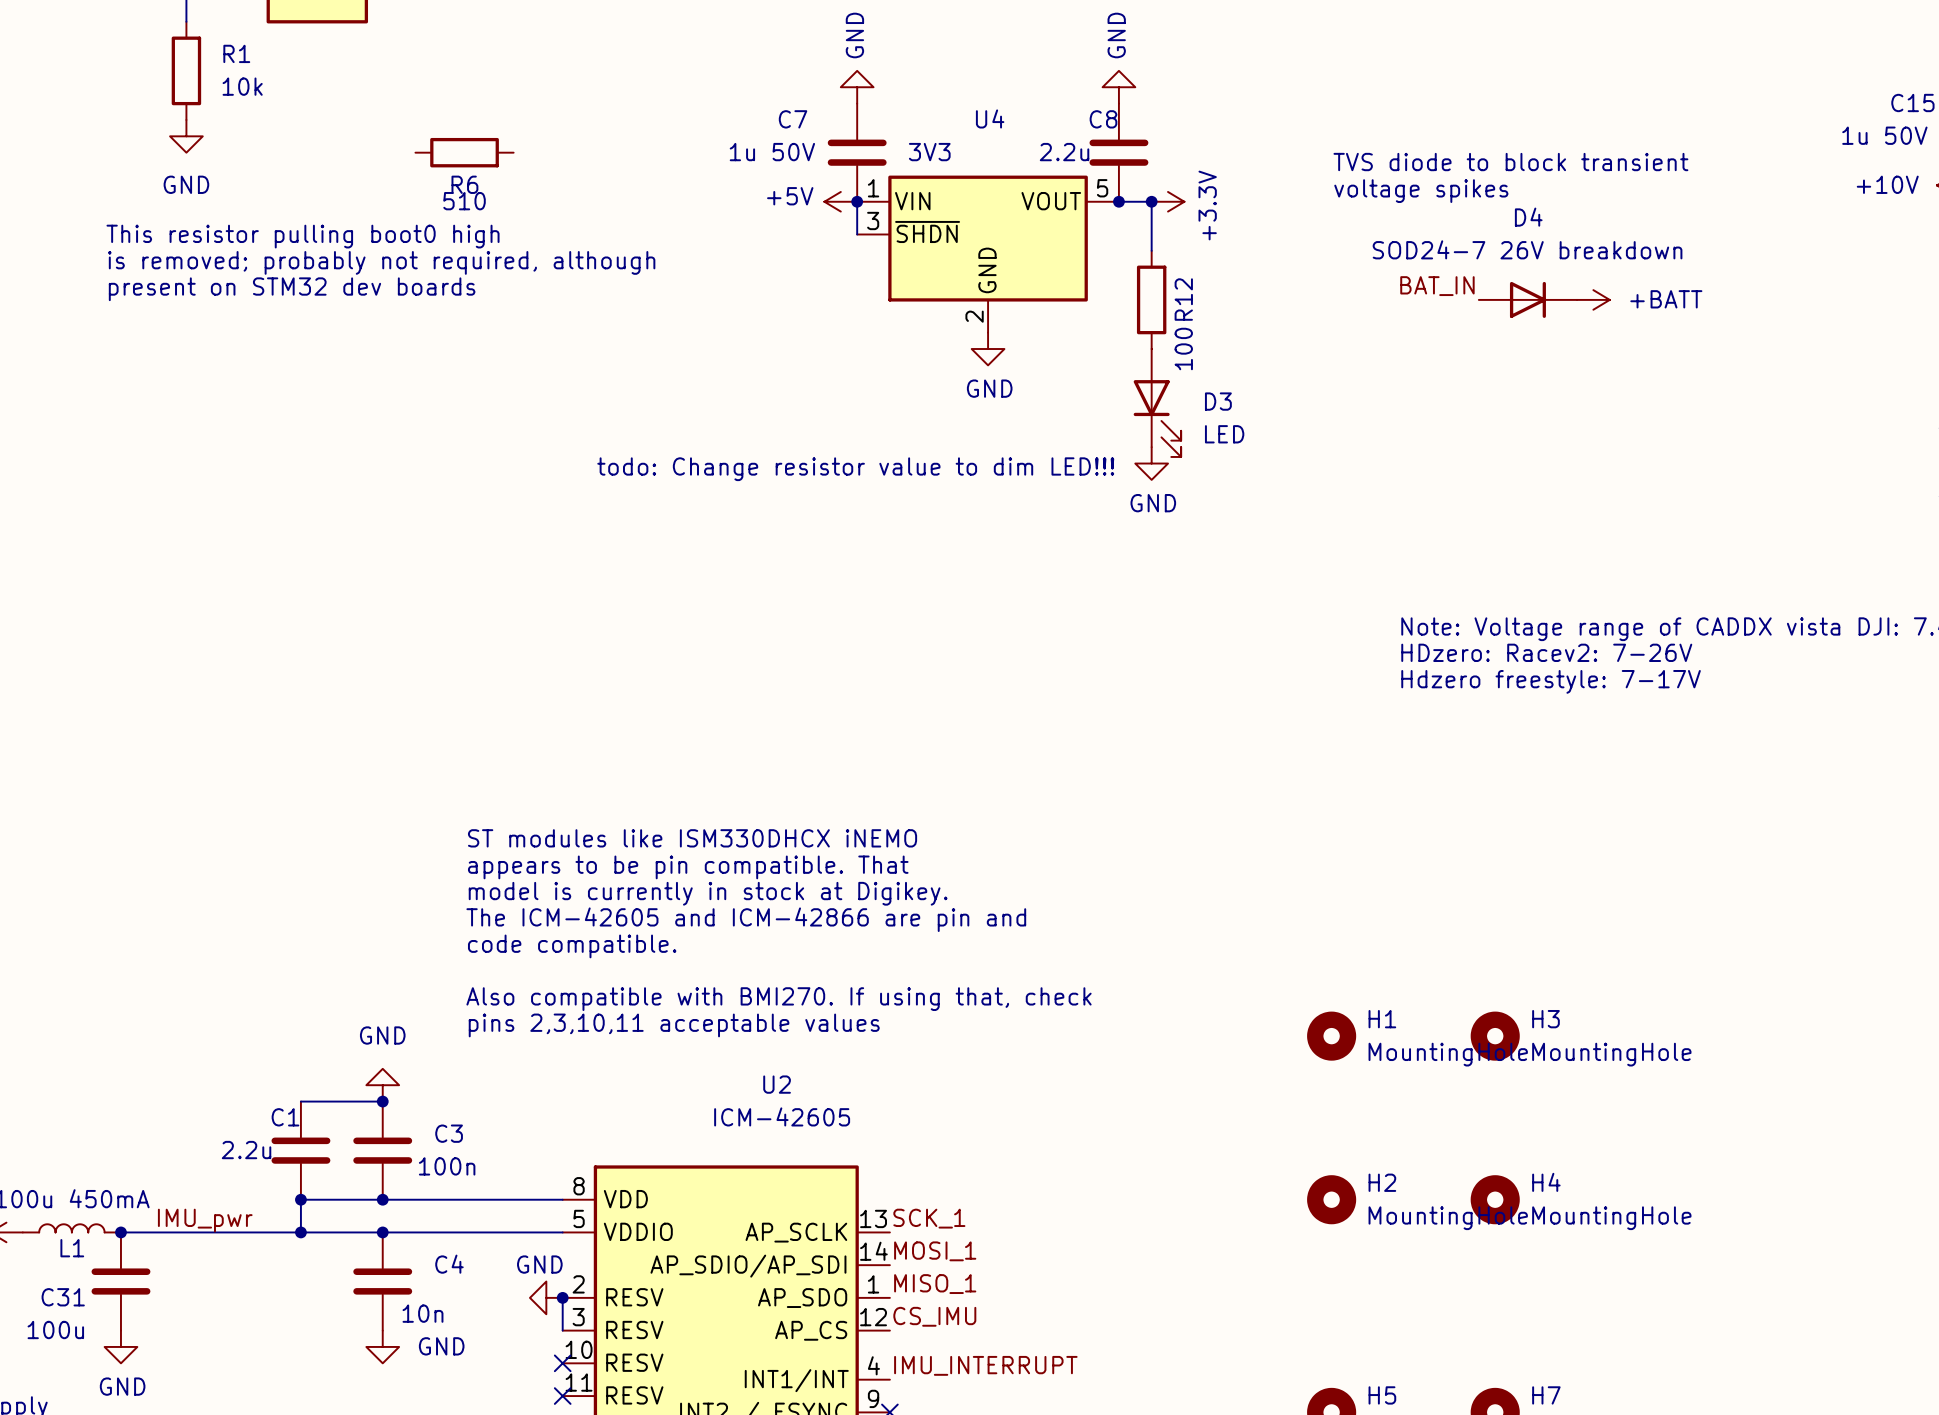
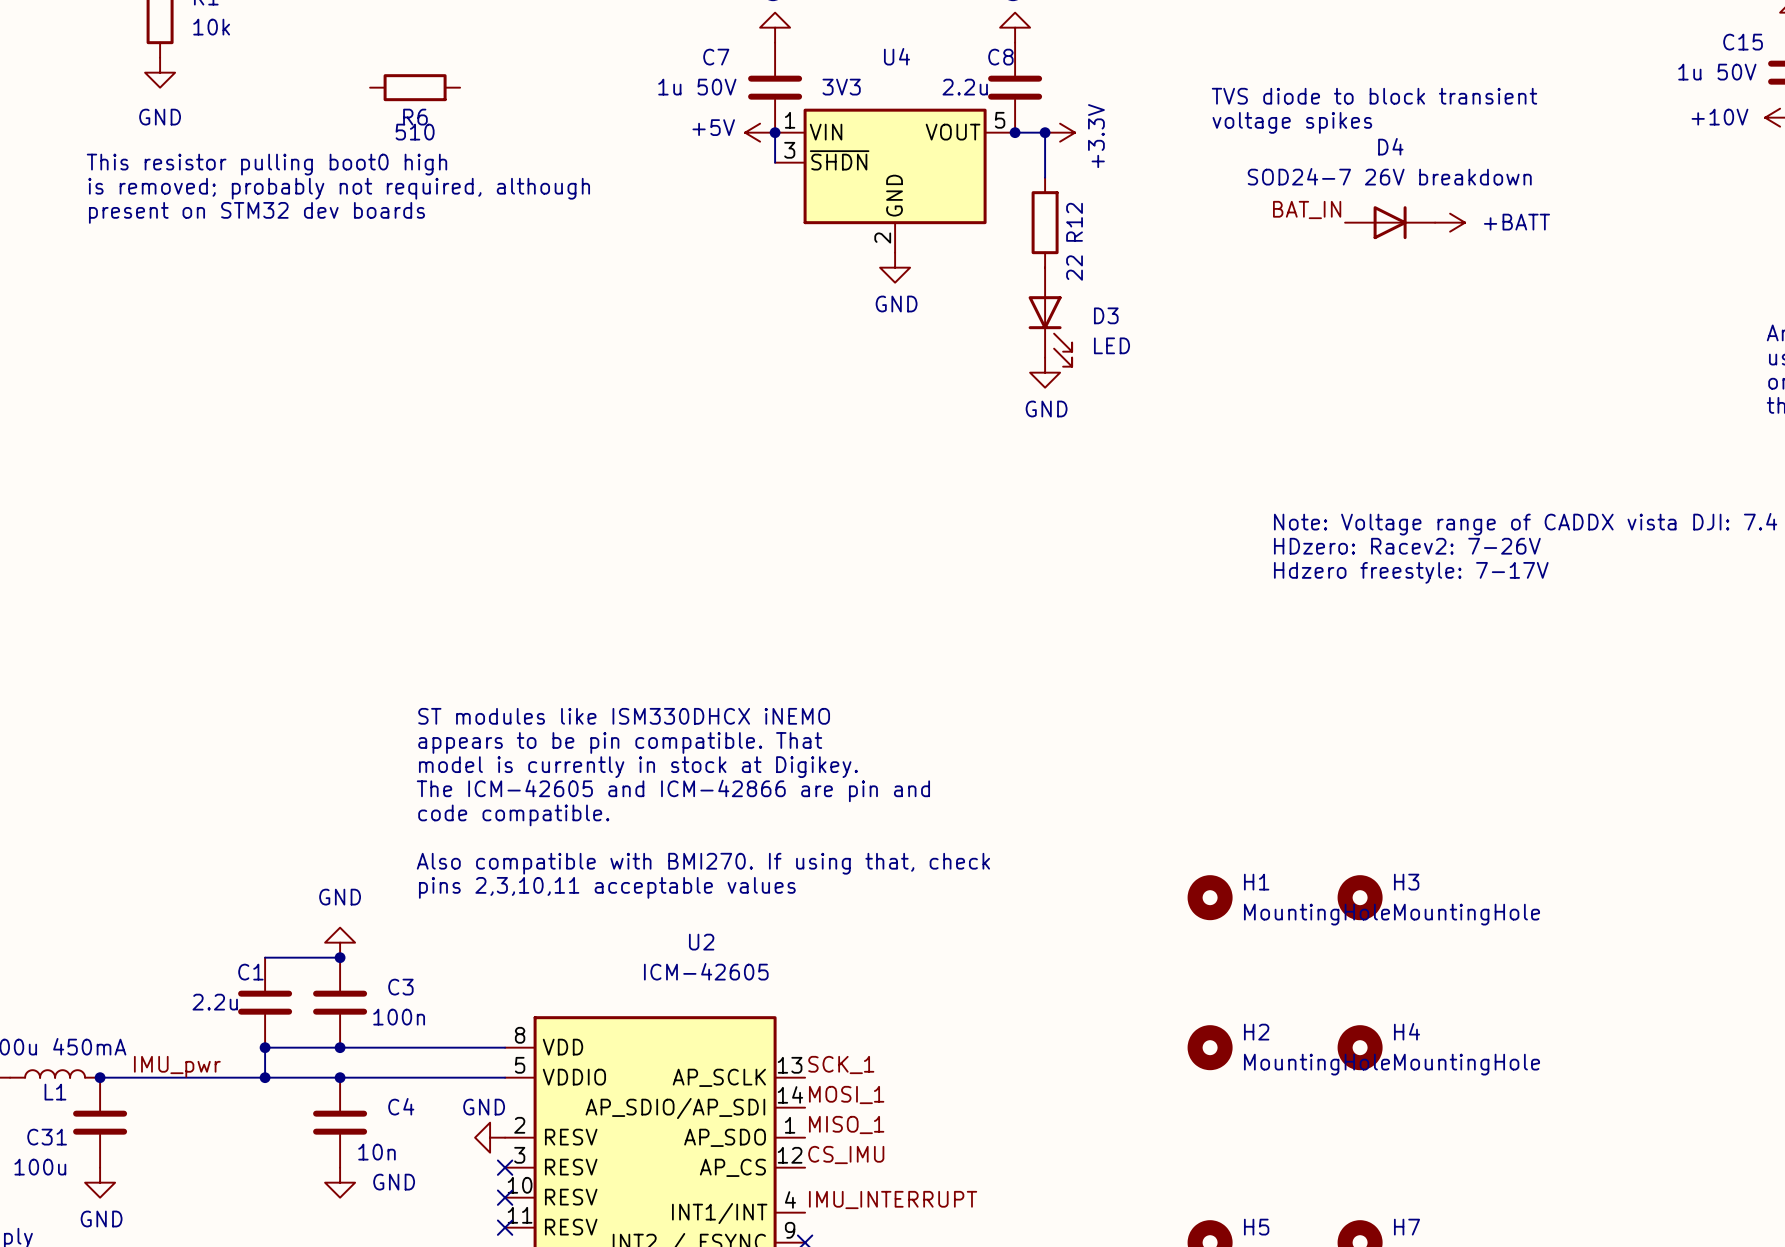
R12 value: 100 (1183, 349) -> 22 (1074, 268)
text: todo: Change resistor value to dim LED!!! (855, 469) -> none
wire: (562, 1297) (562, 1330) -> none
junction: (562, 1297) -> none
no-connect mark: none -> (505, 1167)

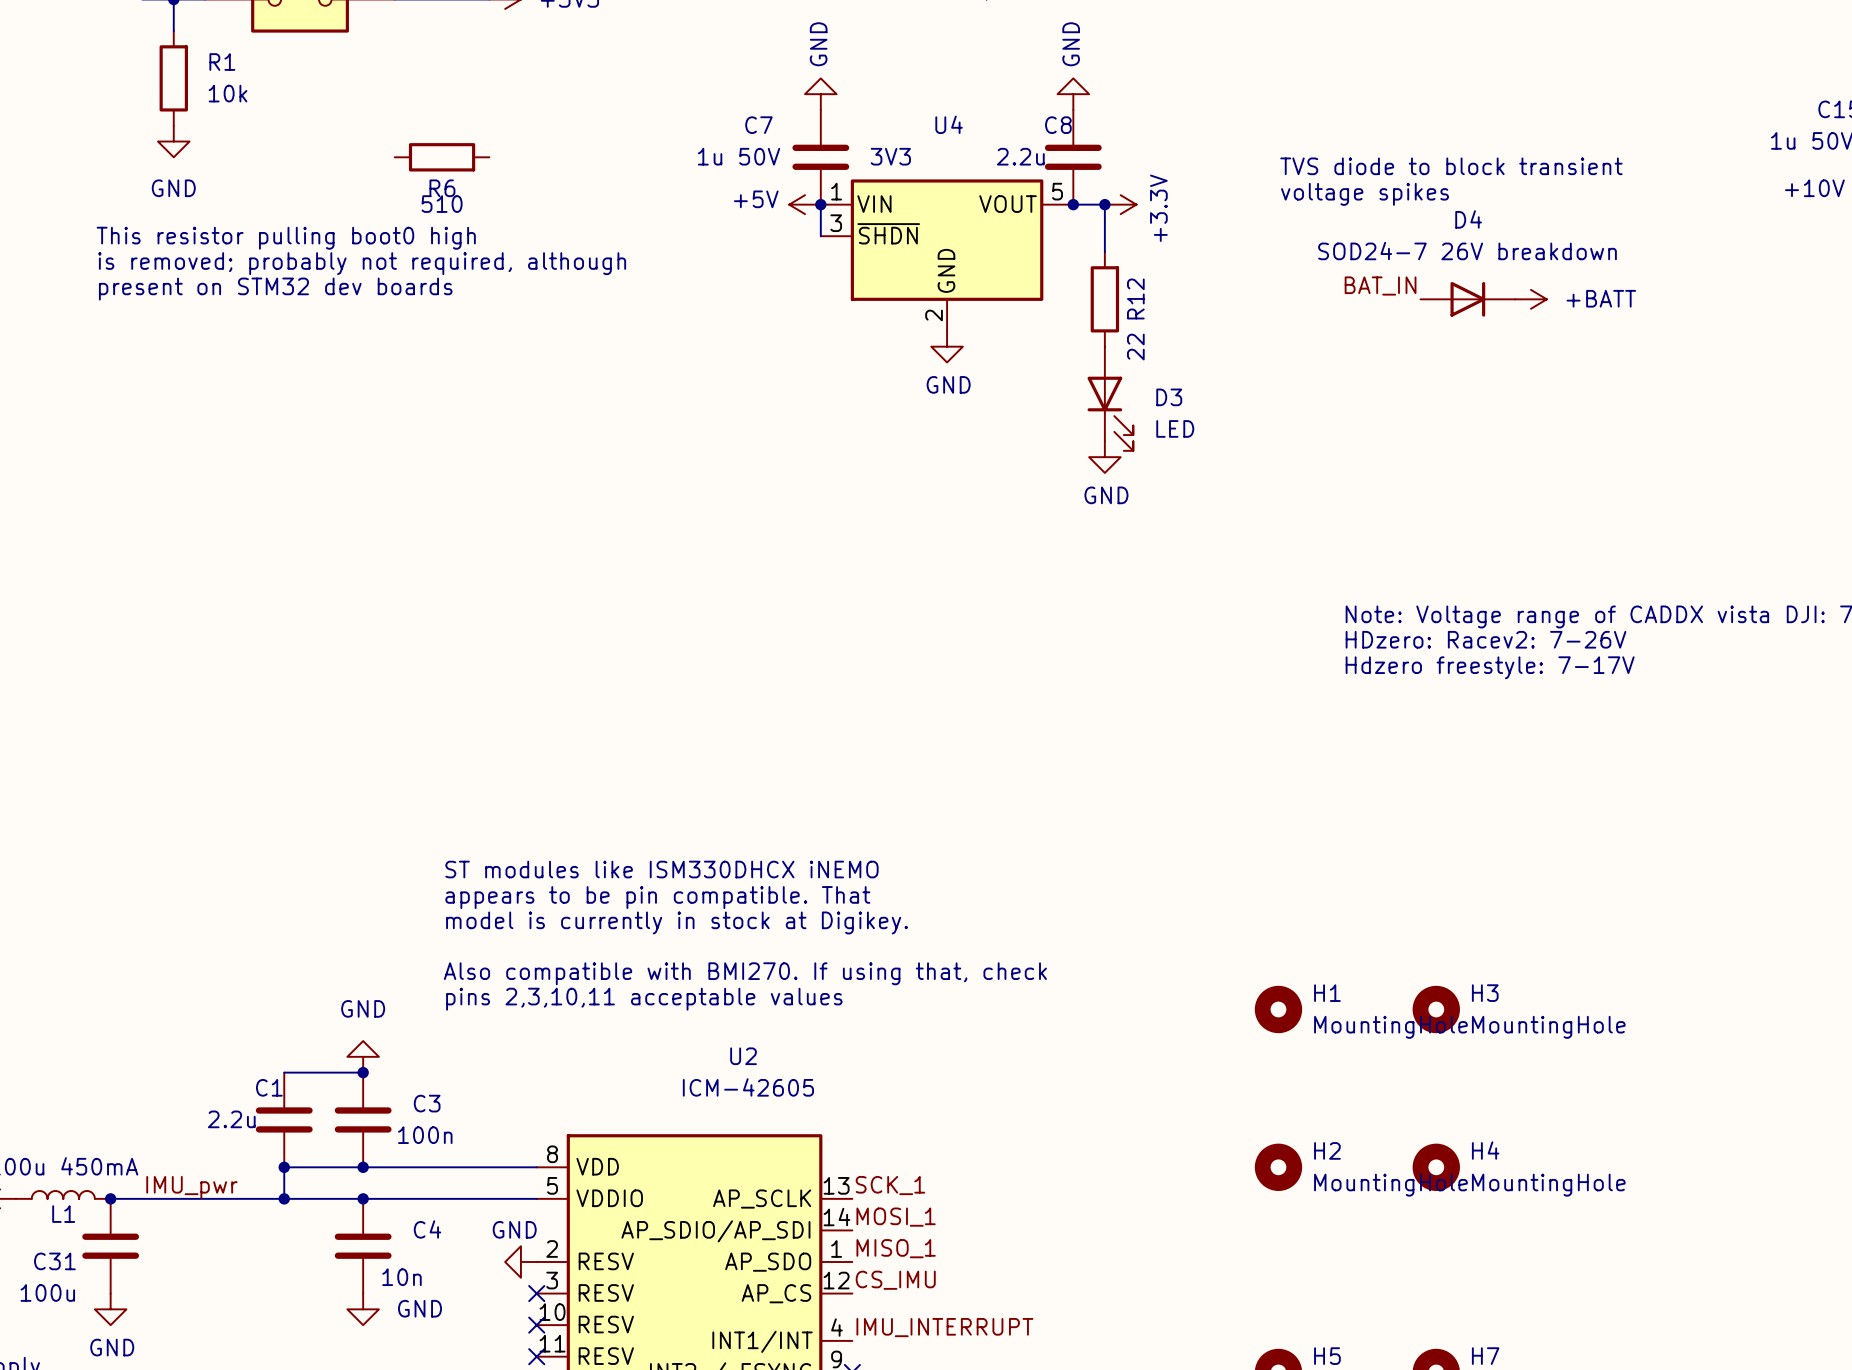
text: ST modules like ISM330DHCX iNEMO (624, 716) -> none
text: appears to be pin compatible. That (620, 742) -> none
text: model is currently in stock at Digikey. (638, 767) -> ST modules like ISM330DHCX iNEMO (661, 869)
text: The ICM-42605 and ICM-42866 are pin and (673, 790) -> appears to be pin compatible. That (657, 897)
text: code compatible. (513, 815) -> model is currently in stock at Digikey. (677, 922)

